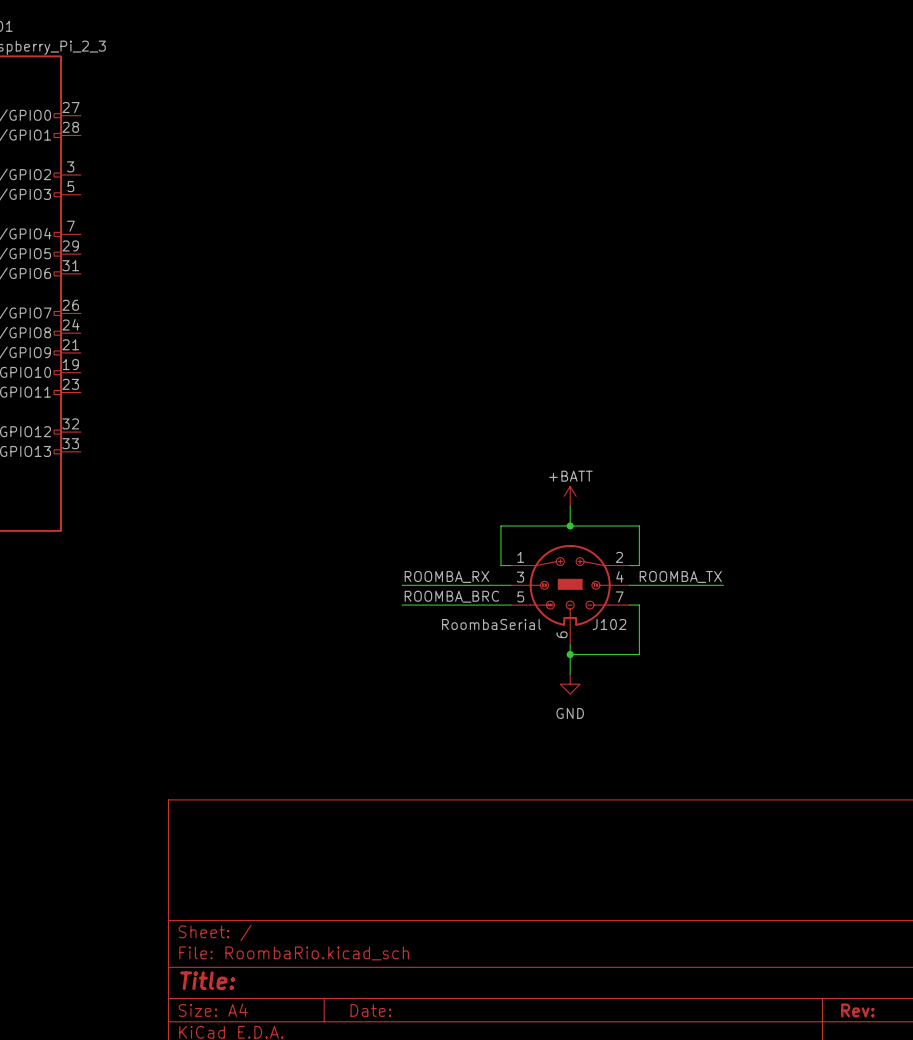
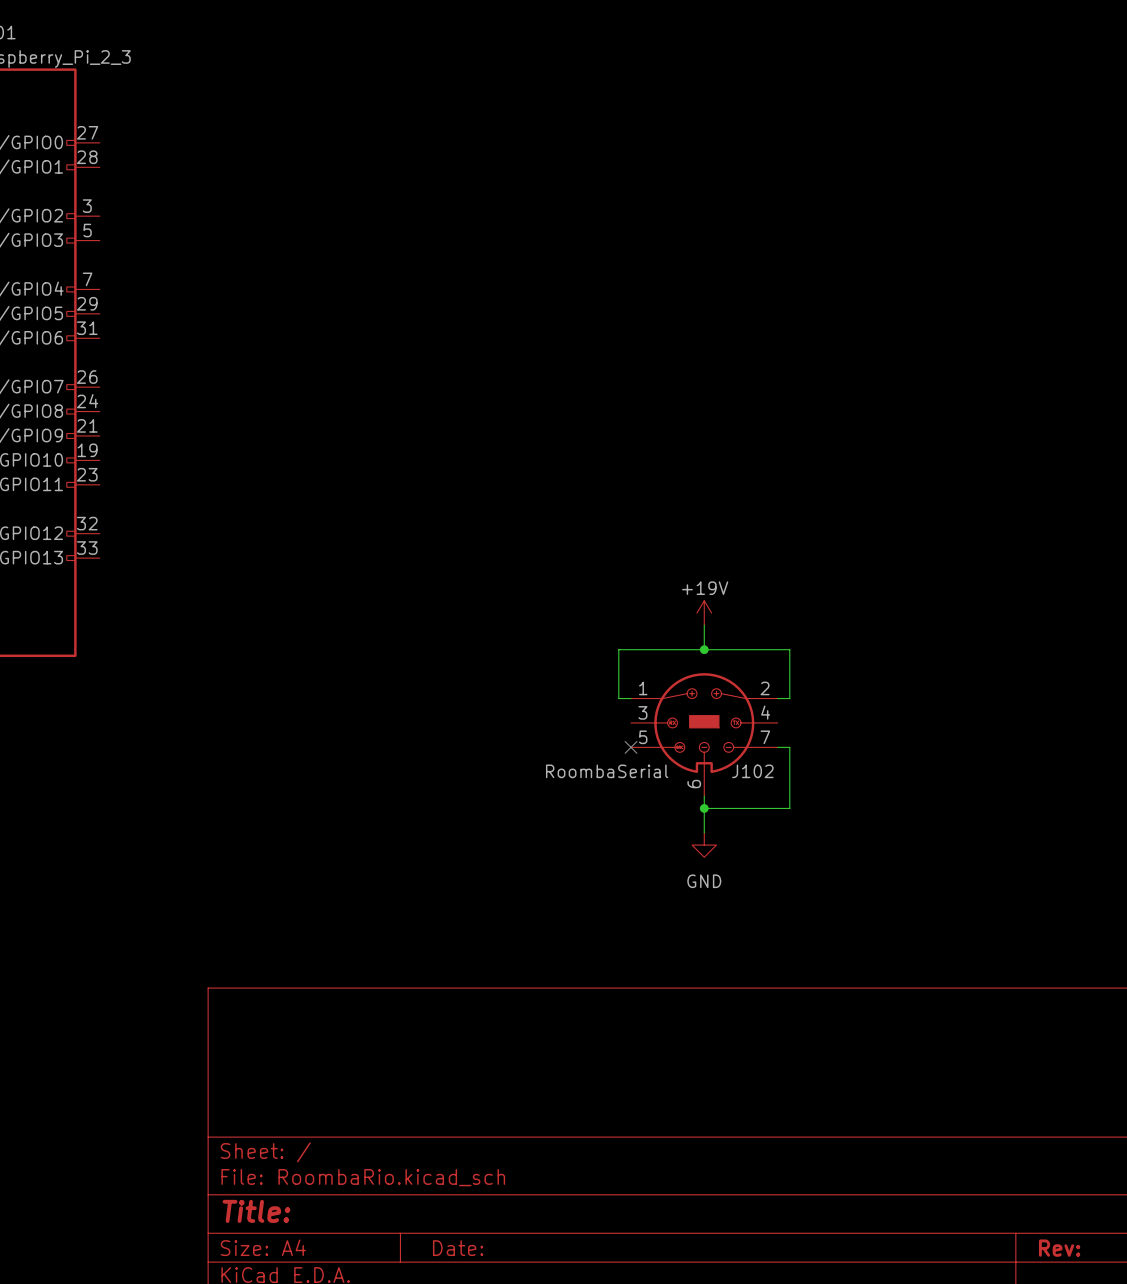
power symbol: +BATT (570, 496) -> +19V (704, 613)
label: ROOMBA_RX (446, 576) -> none
label: ROOMBA_TX (680, 576) -> none
wire: (402, 585) (510, 585) -> none
wire: (629, 585) (723, 585) -> none
label: ROOMBA_BRC (451, 596) -> none
wire: (402, 605) (510, 605) -> none
no-connect mark: none -> (631, 747)

